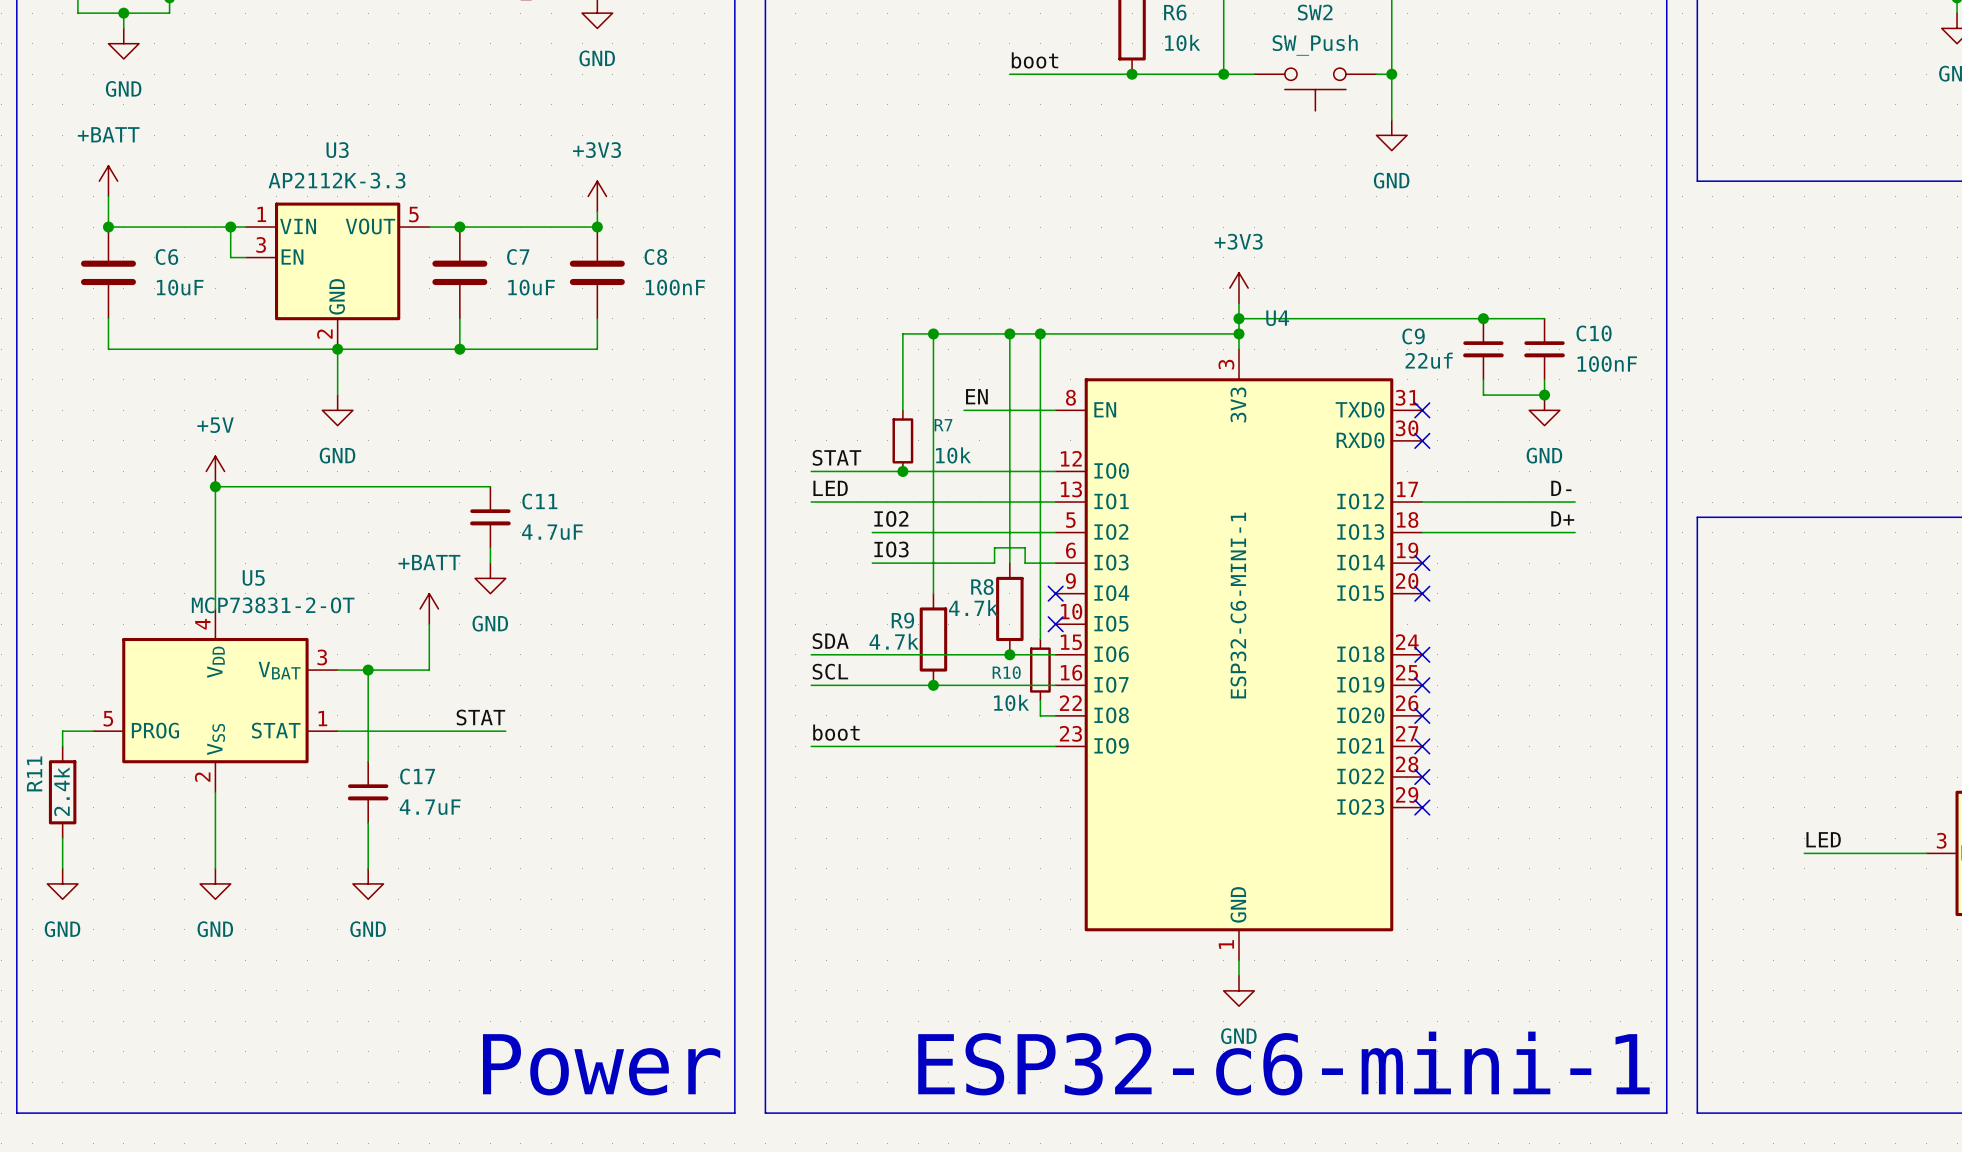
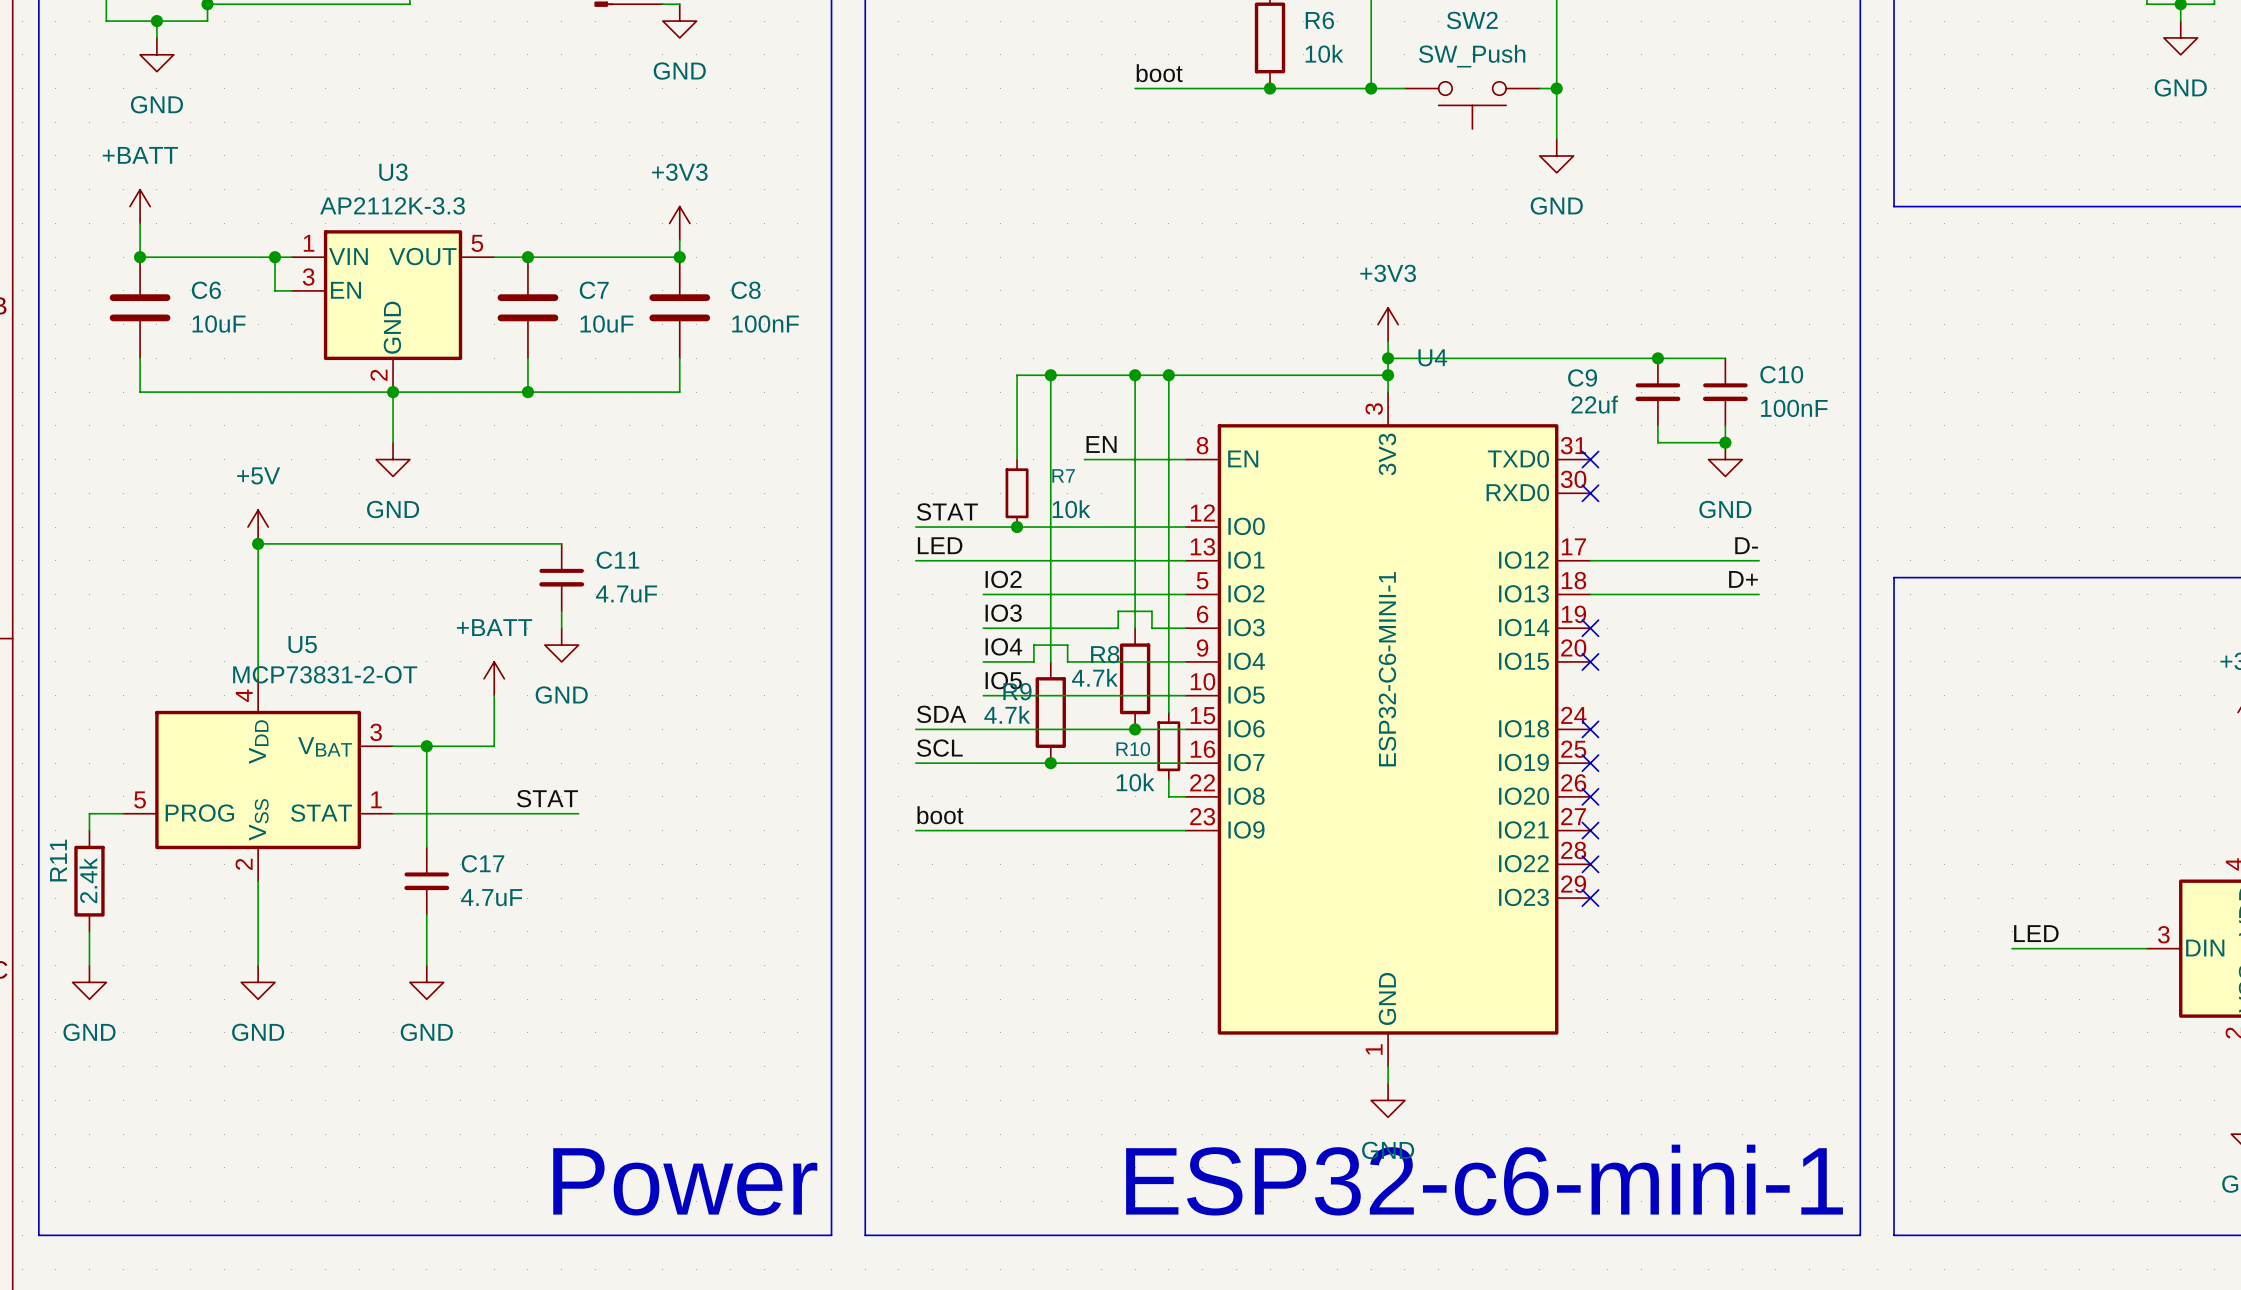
label: none -> IO4 (1003, 646)
wire: none -> (983, 661) (1033, 661) (1033, 645) (1067, 645) (1067, 661) (1185, 661)
no-connect mark: (1055, 593) -> none
label: none -> IO5 (1003, 680)
wire: none -> (983, 695) (1185, 695)
no-connect mark: (1055, 624) -> none

